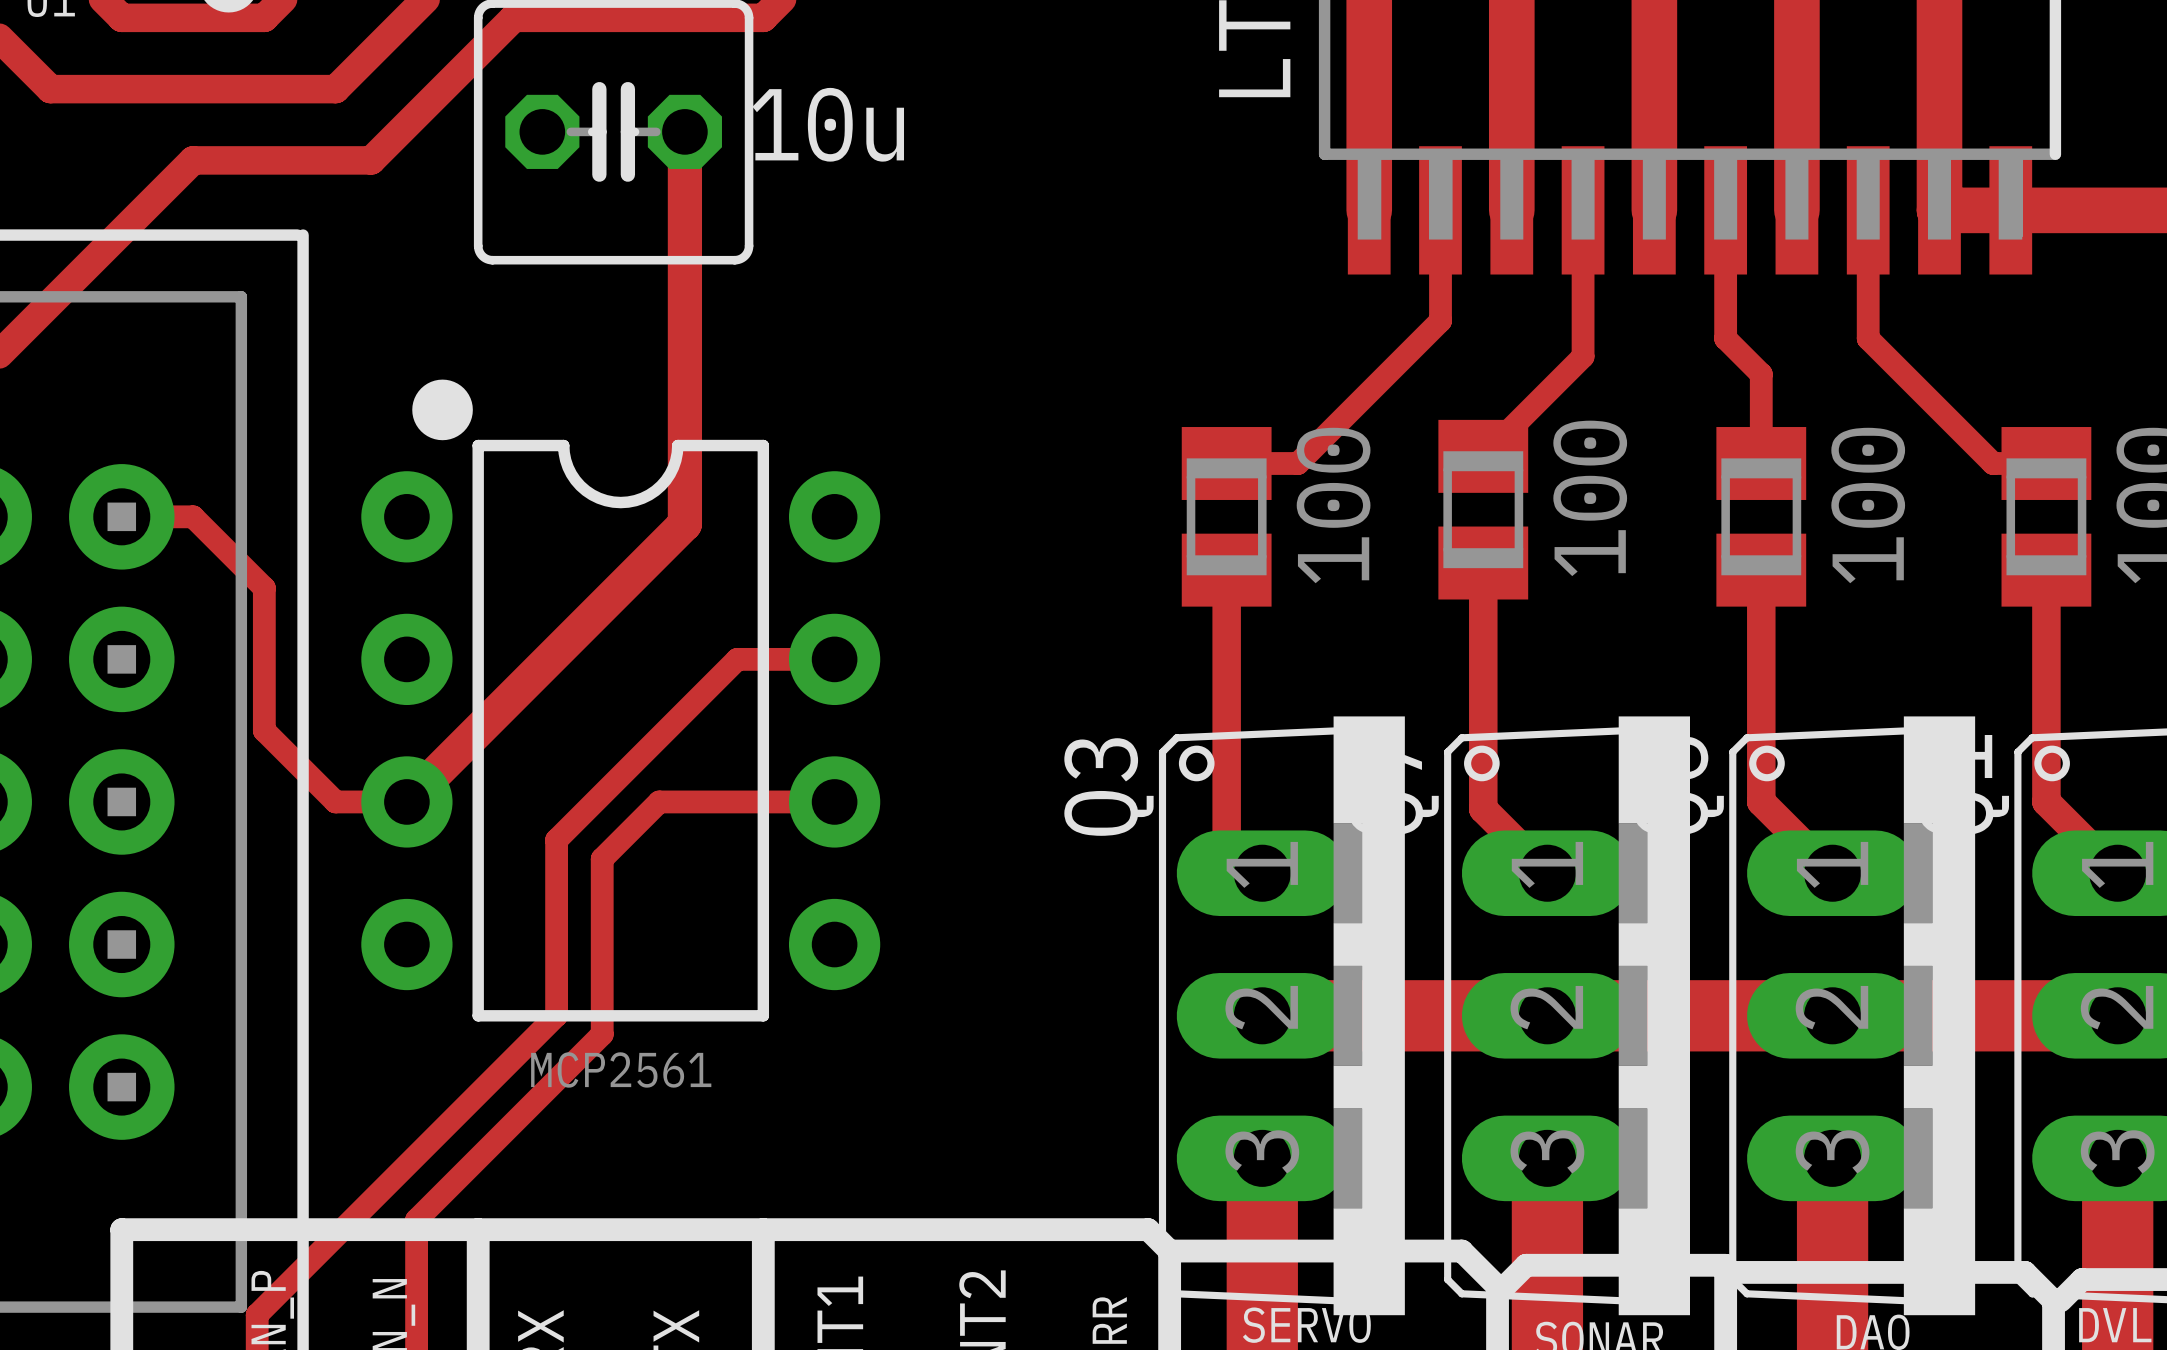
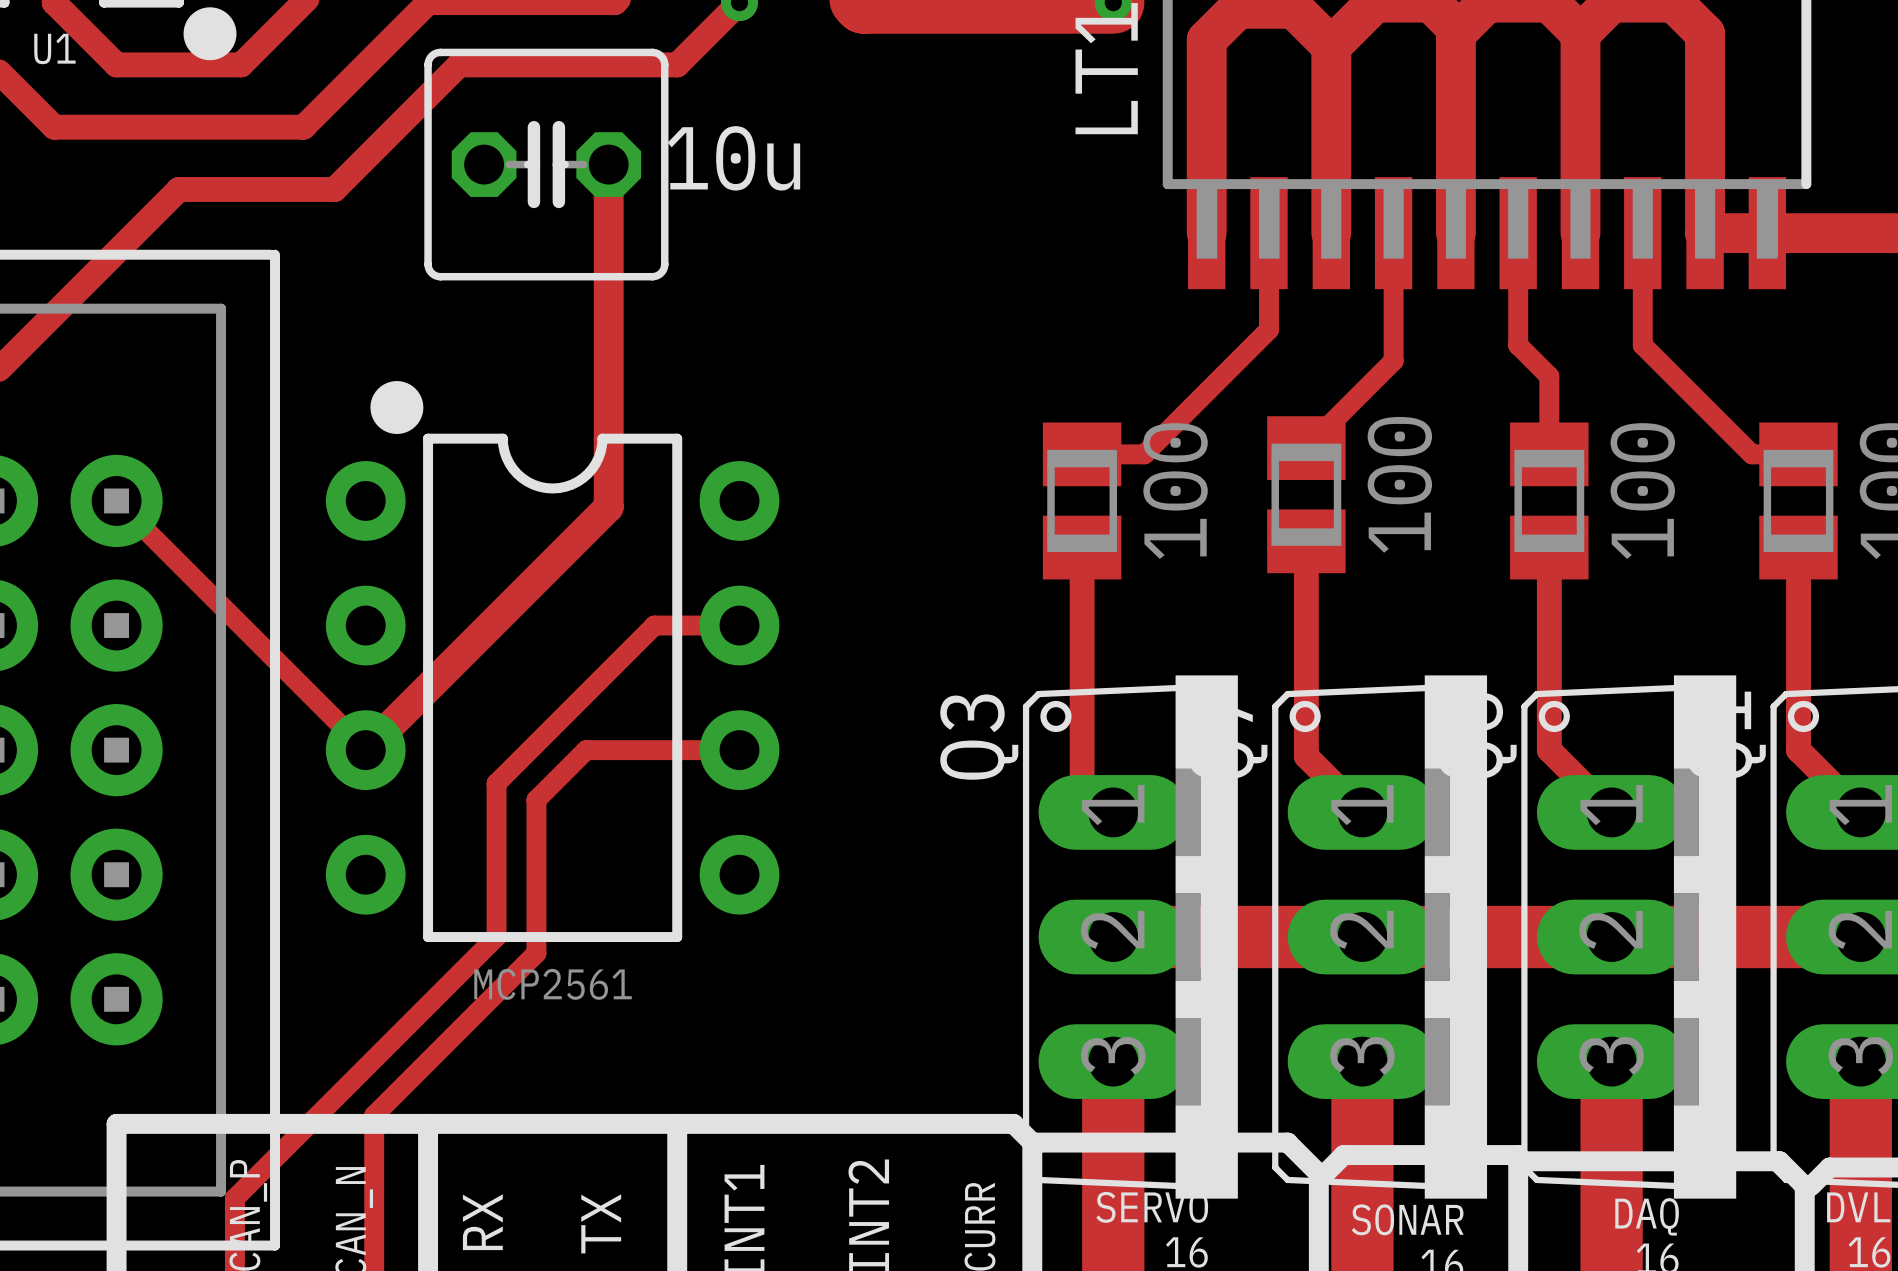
track: (121, 516) (193, 516) (264, 588) (264, 730) (335, 801) (406, 801) -> (116, 500) (365, 750)

